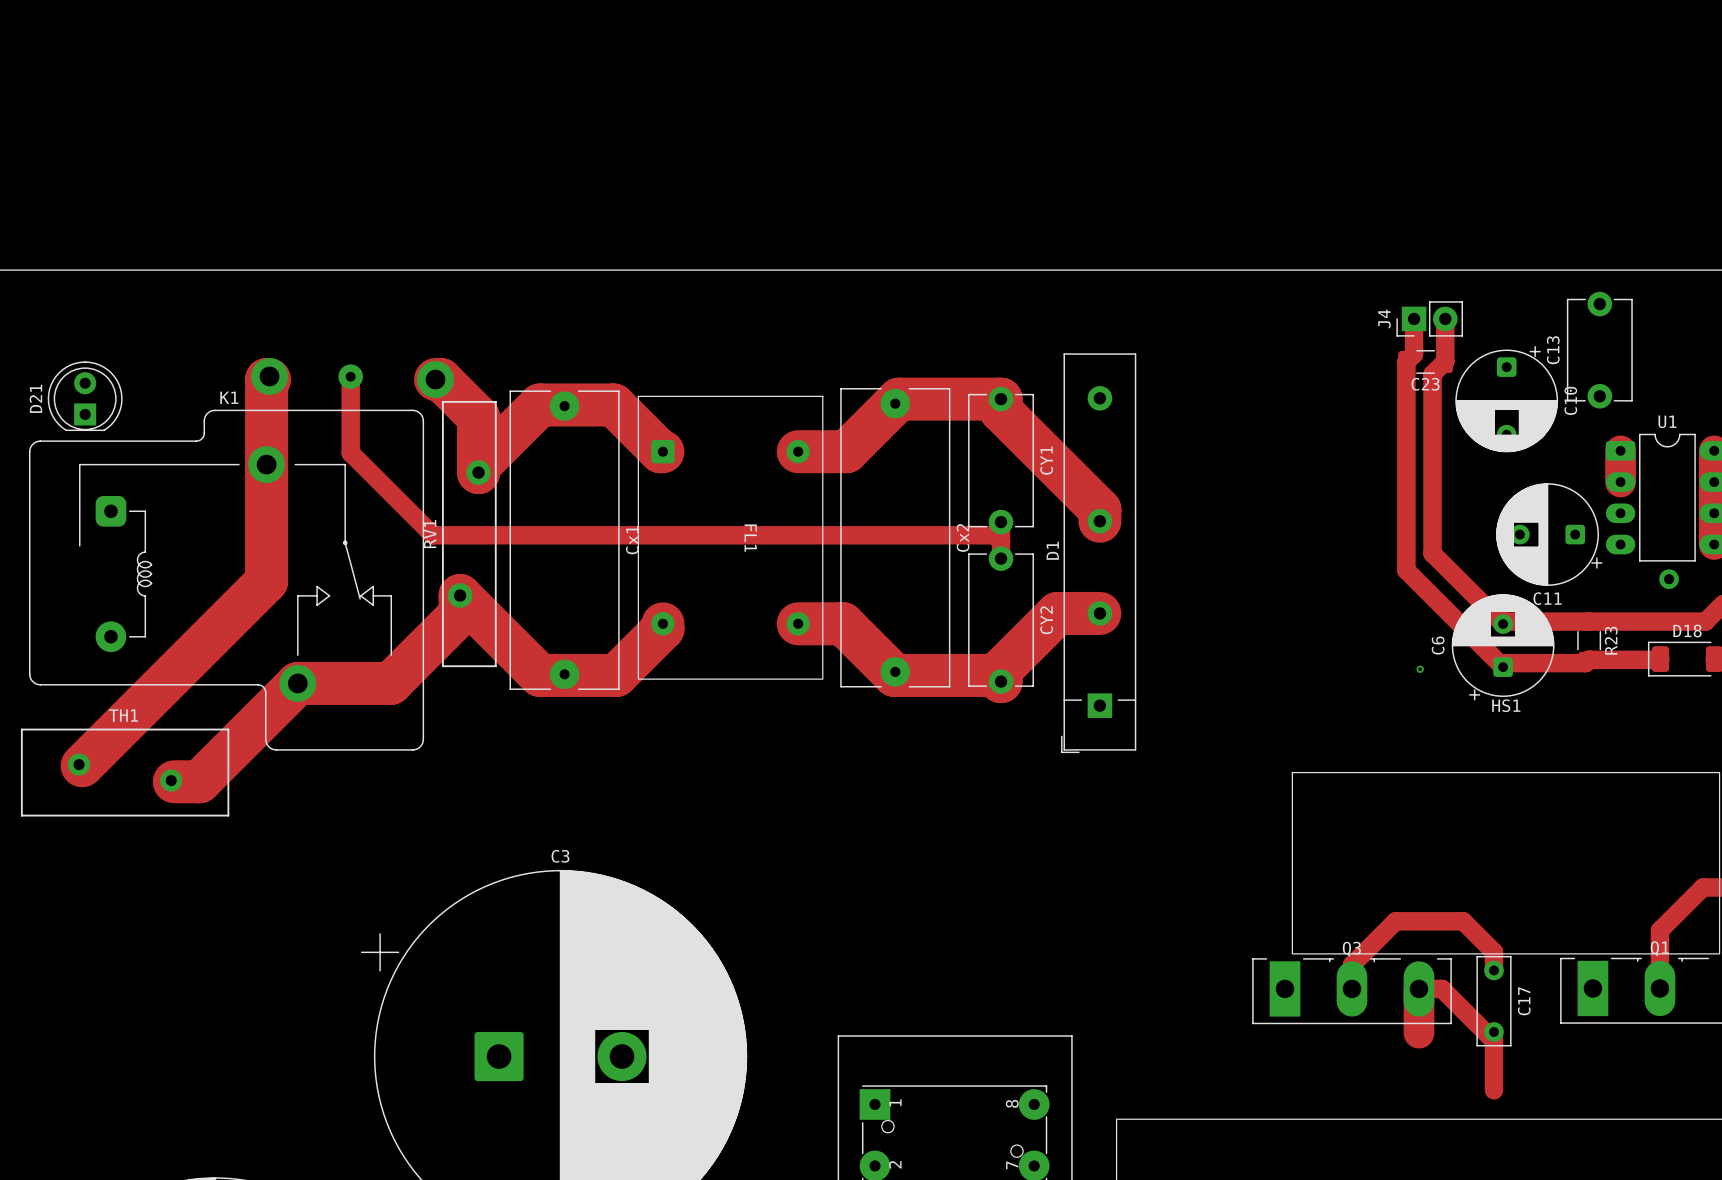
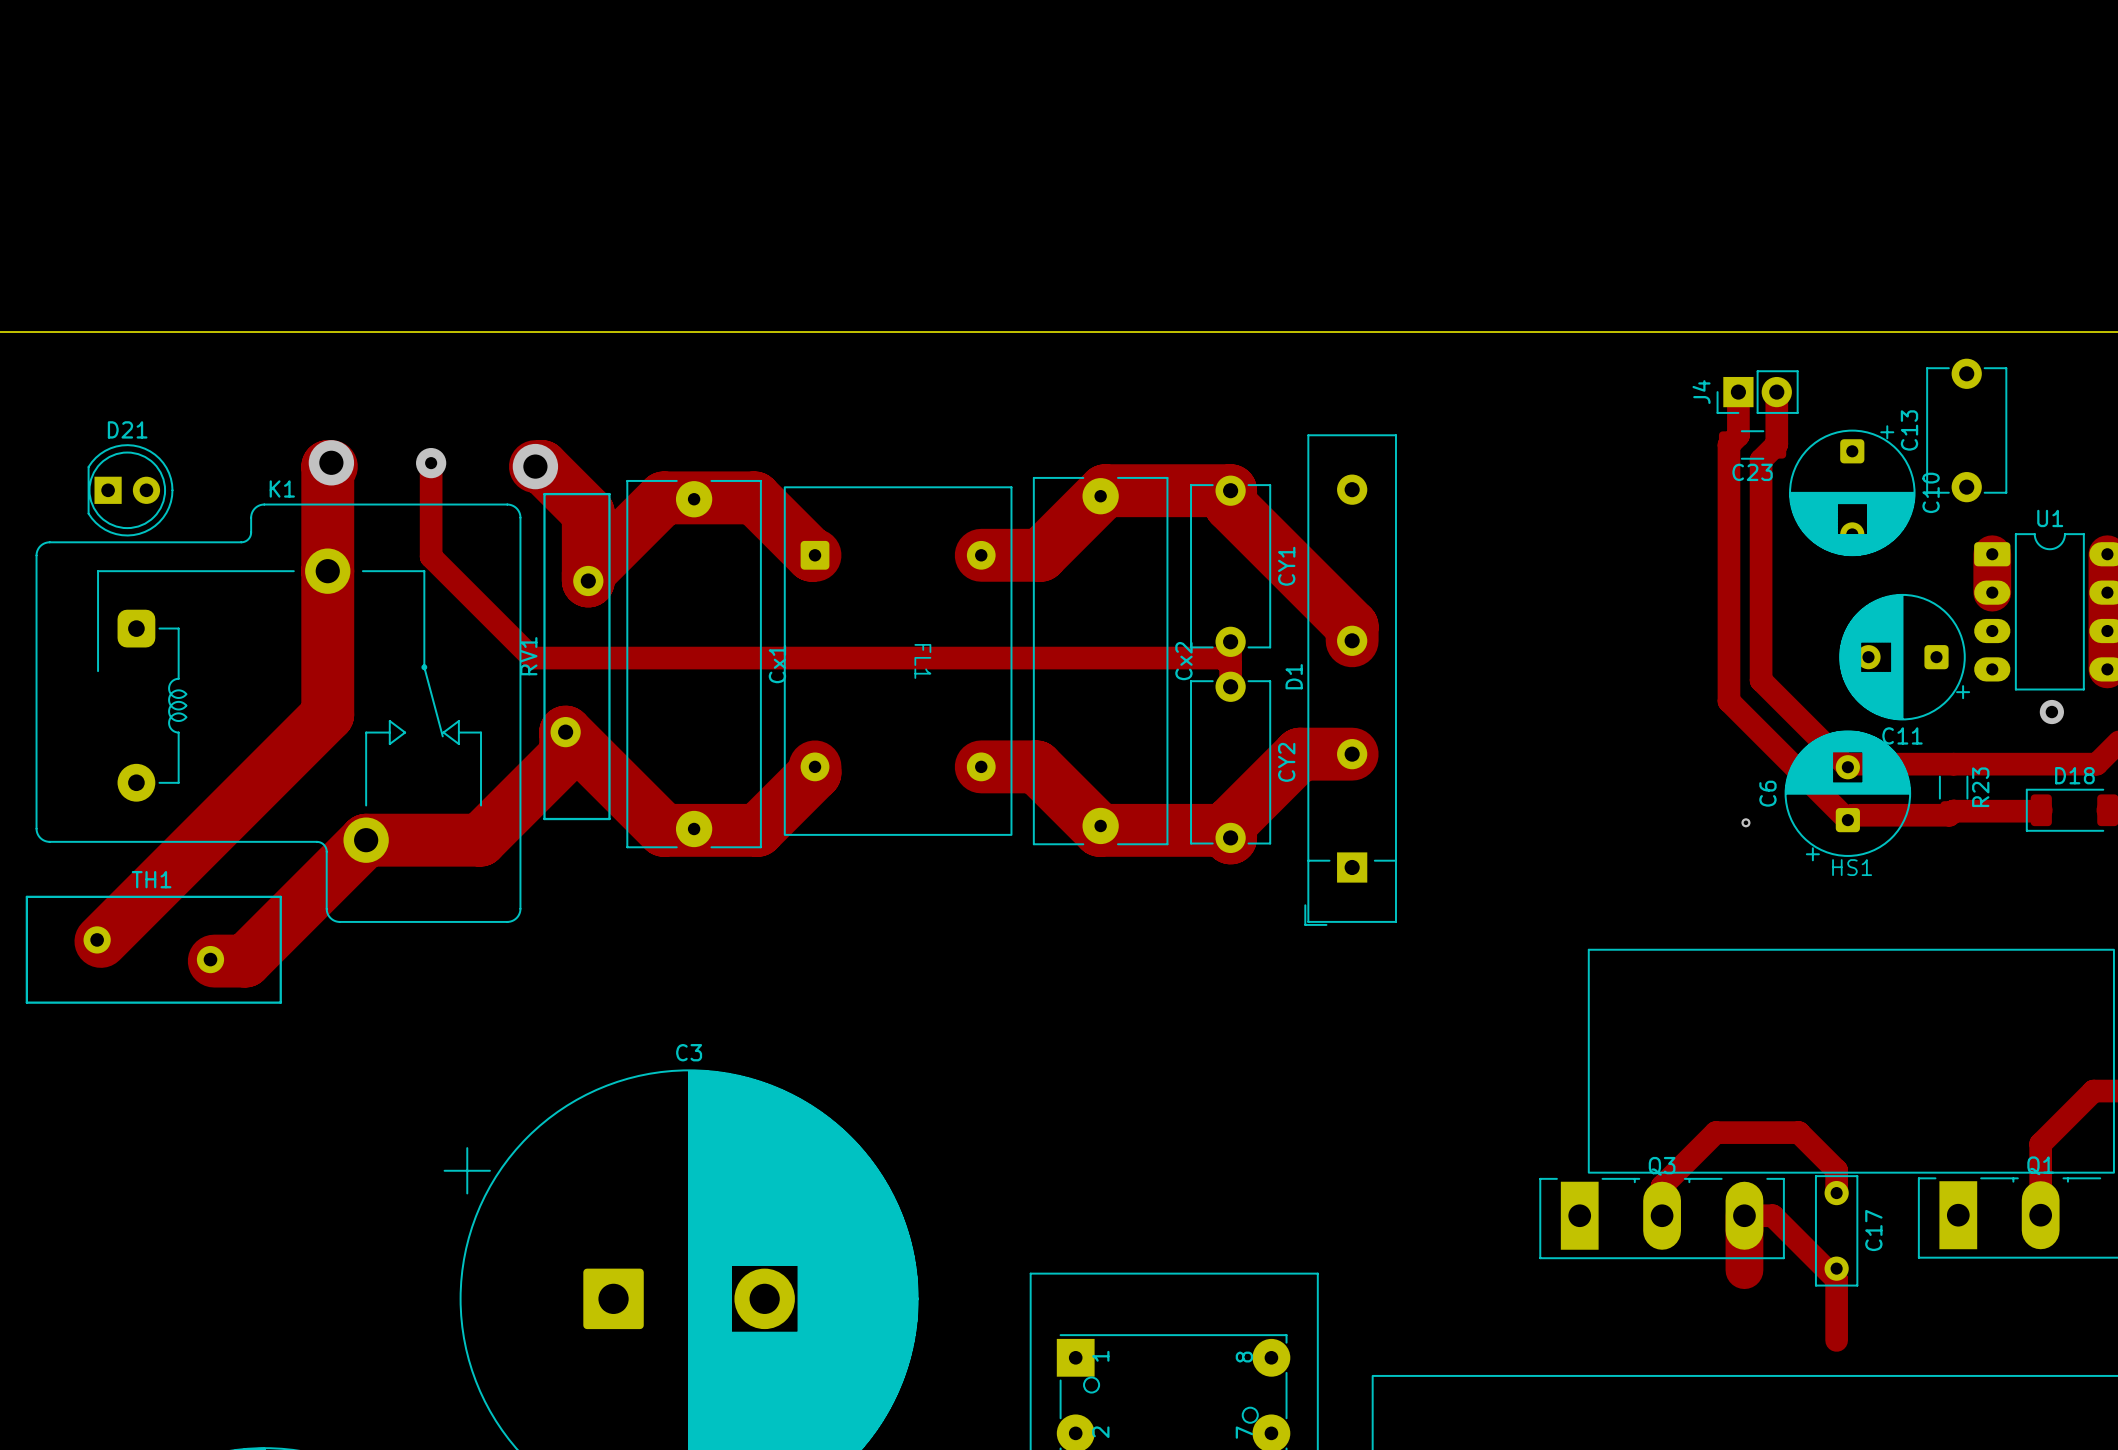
D21 rotation: 0° (85, 396) -> 90° clockwise (130, 490)

